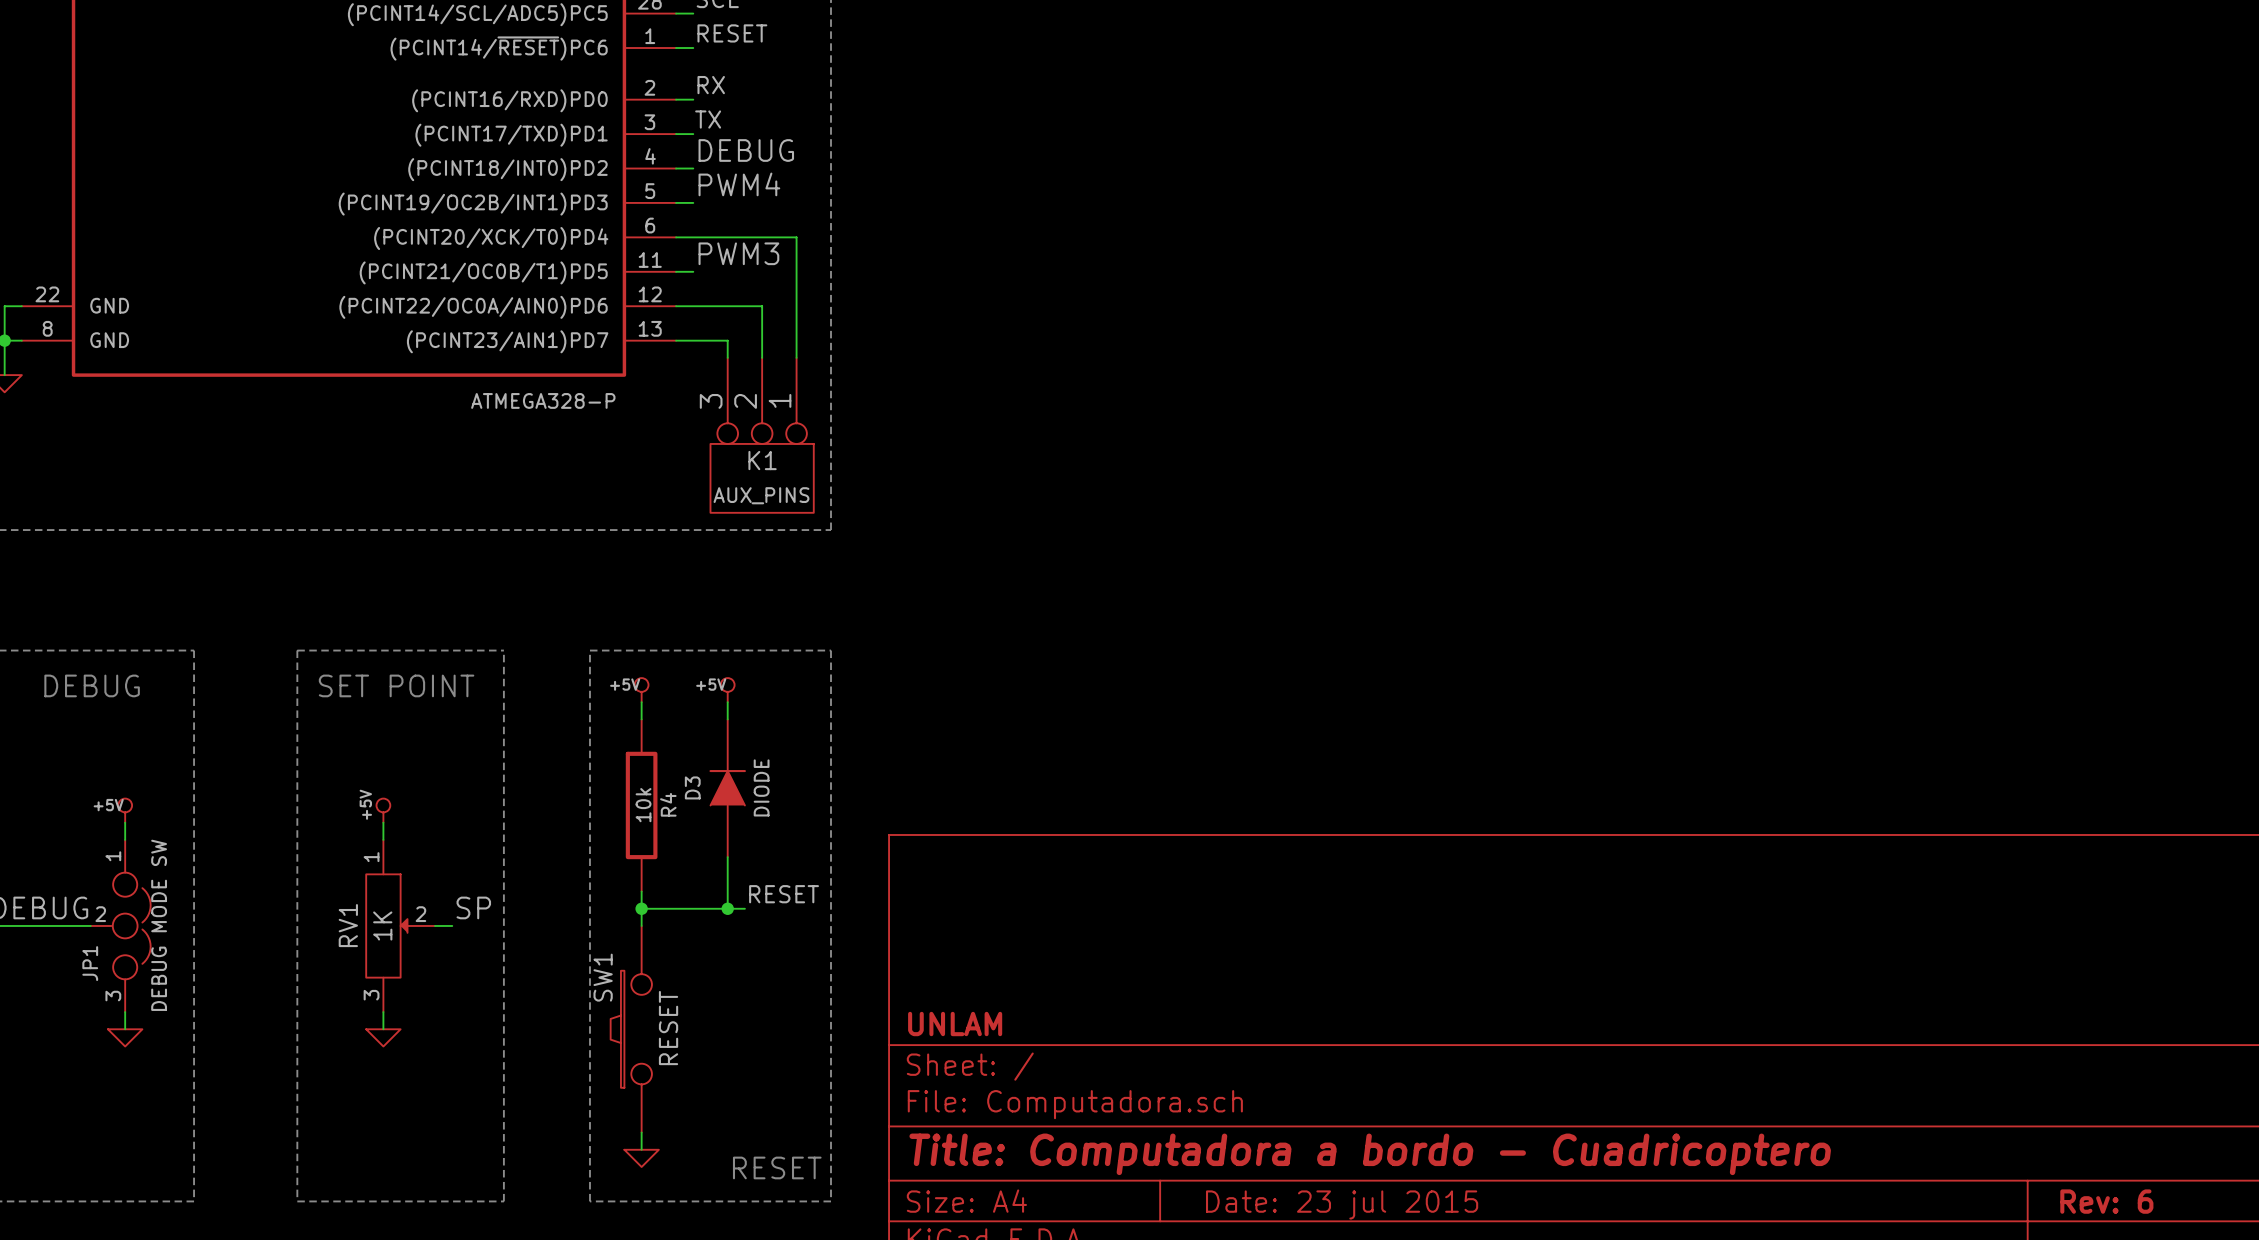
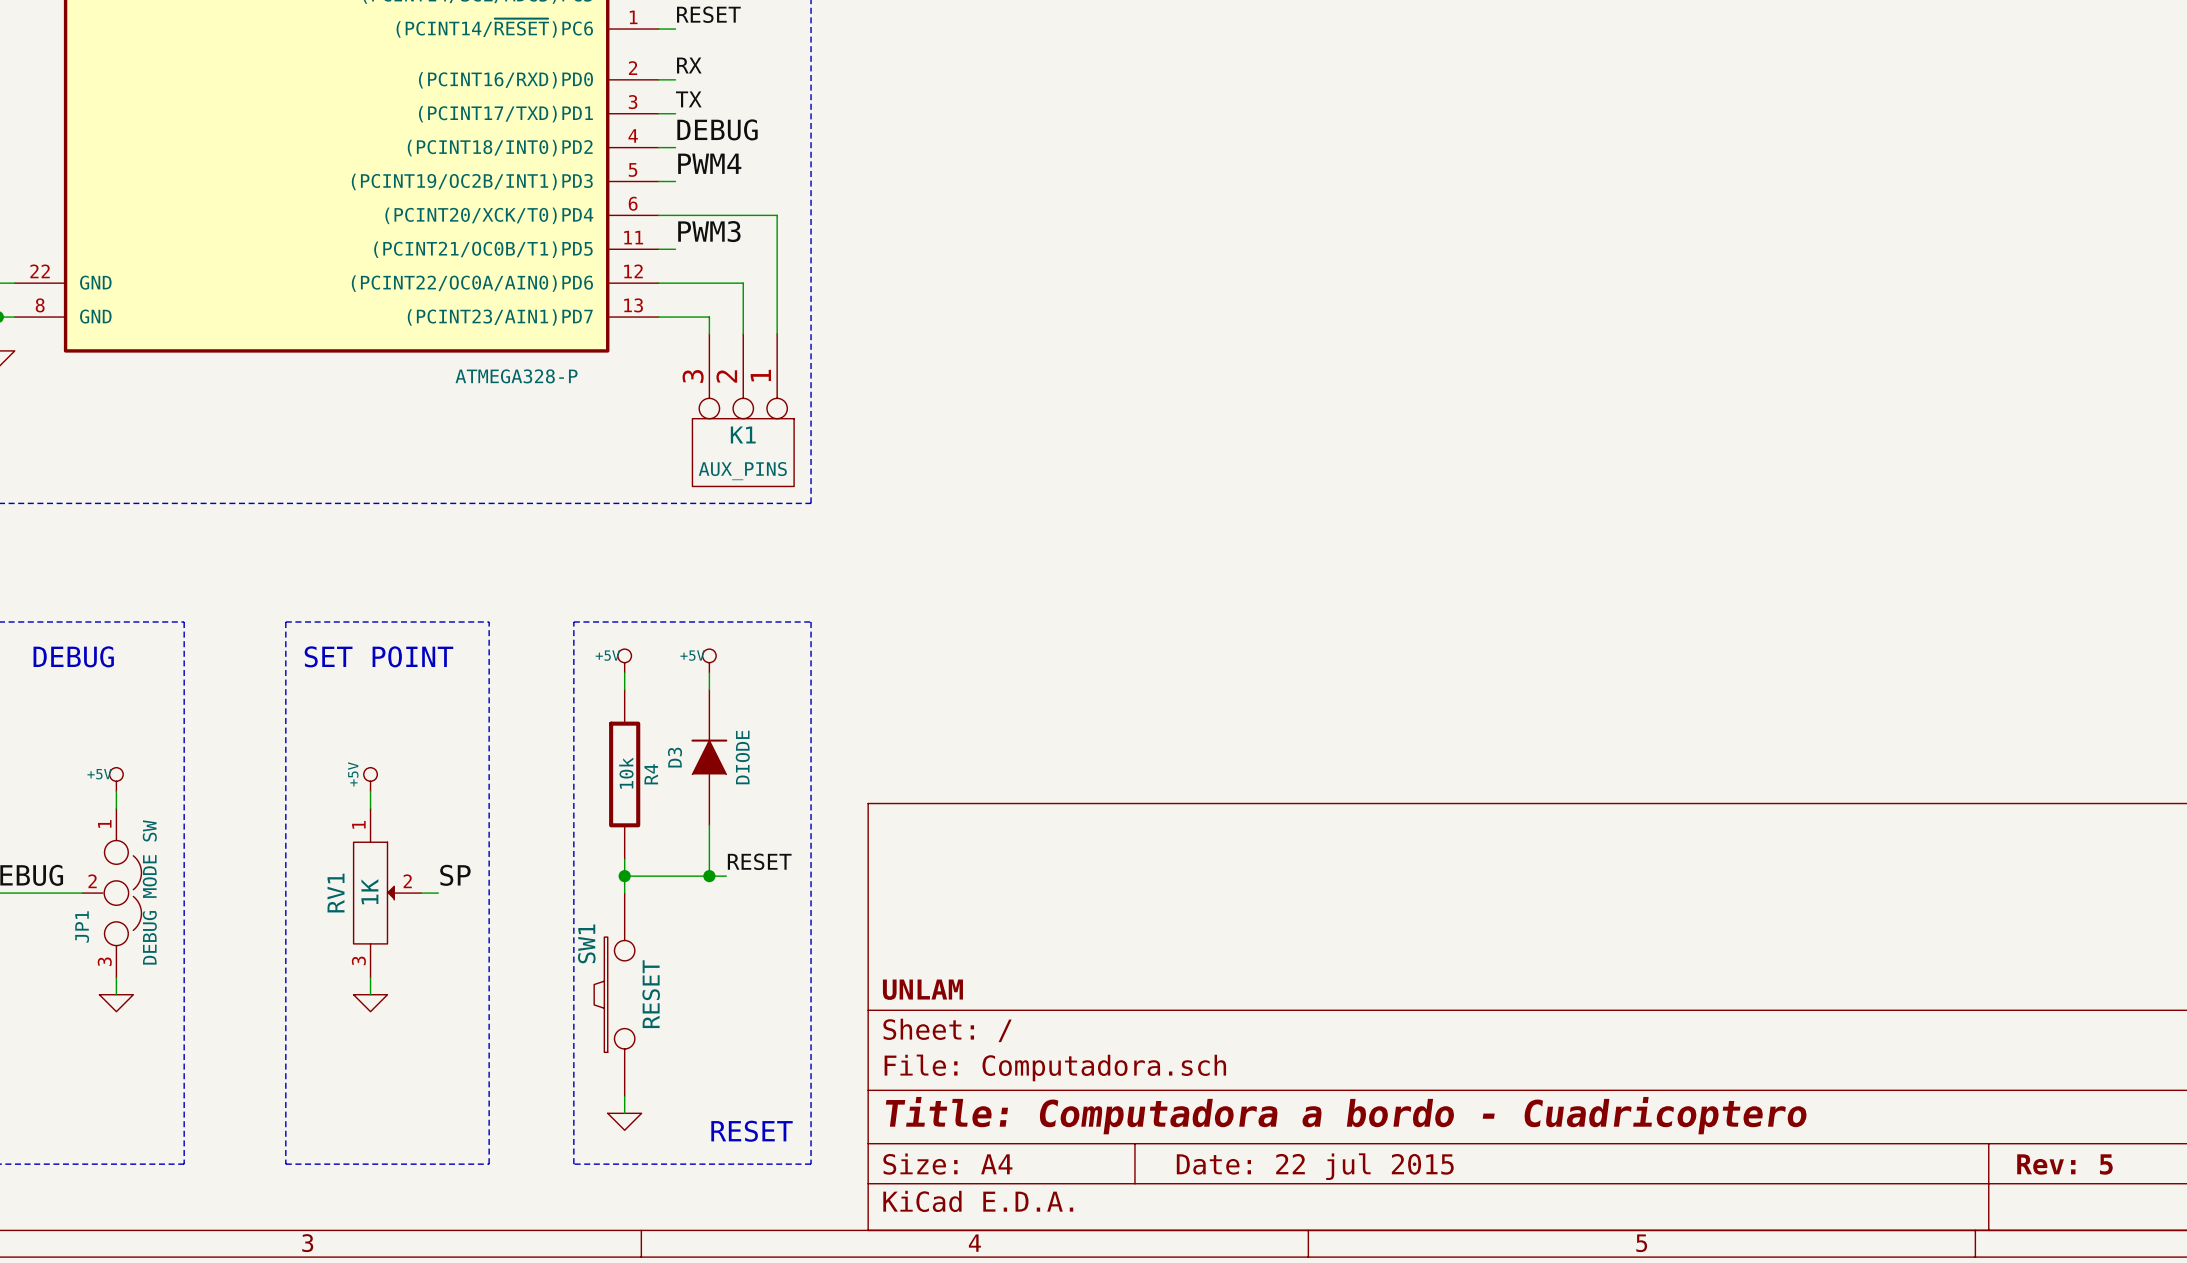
title block: Rev: 6 (2106, 1201) -> Rev: 5 (2064, 1164)
title block: Date: 23 jul 2015 (1342, 1204) -> Date: 22 jul 2015 (1315, 1166)

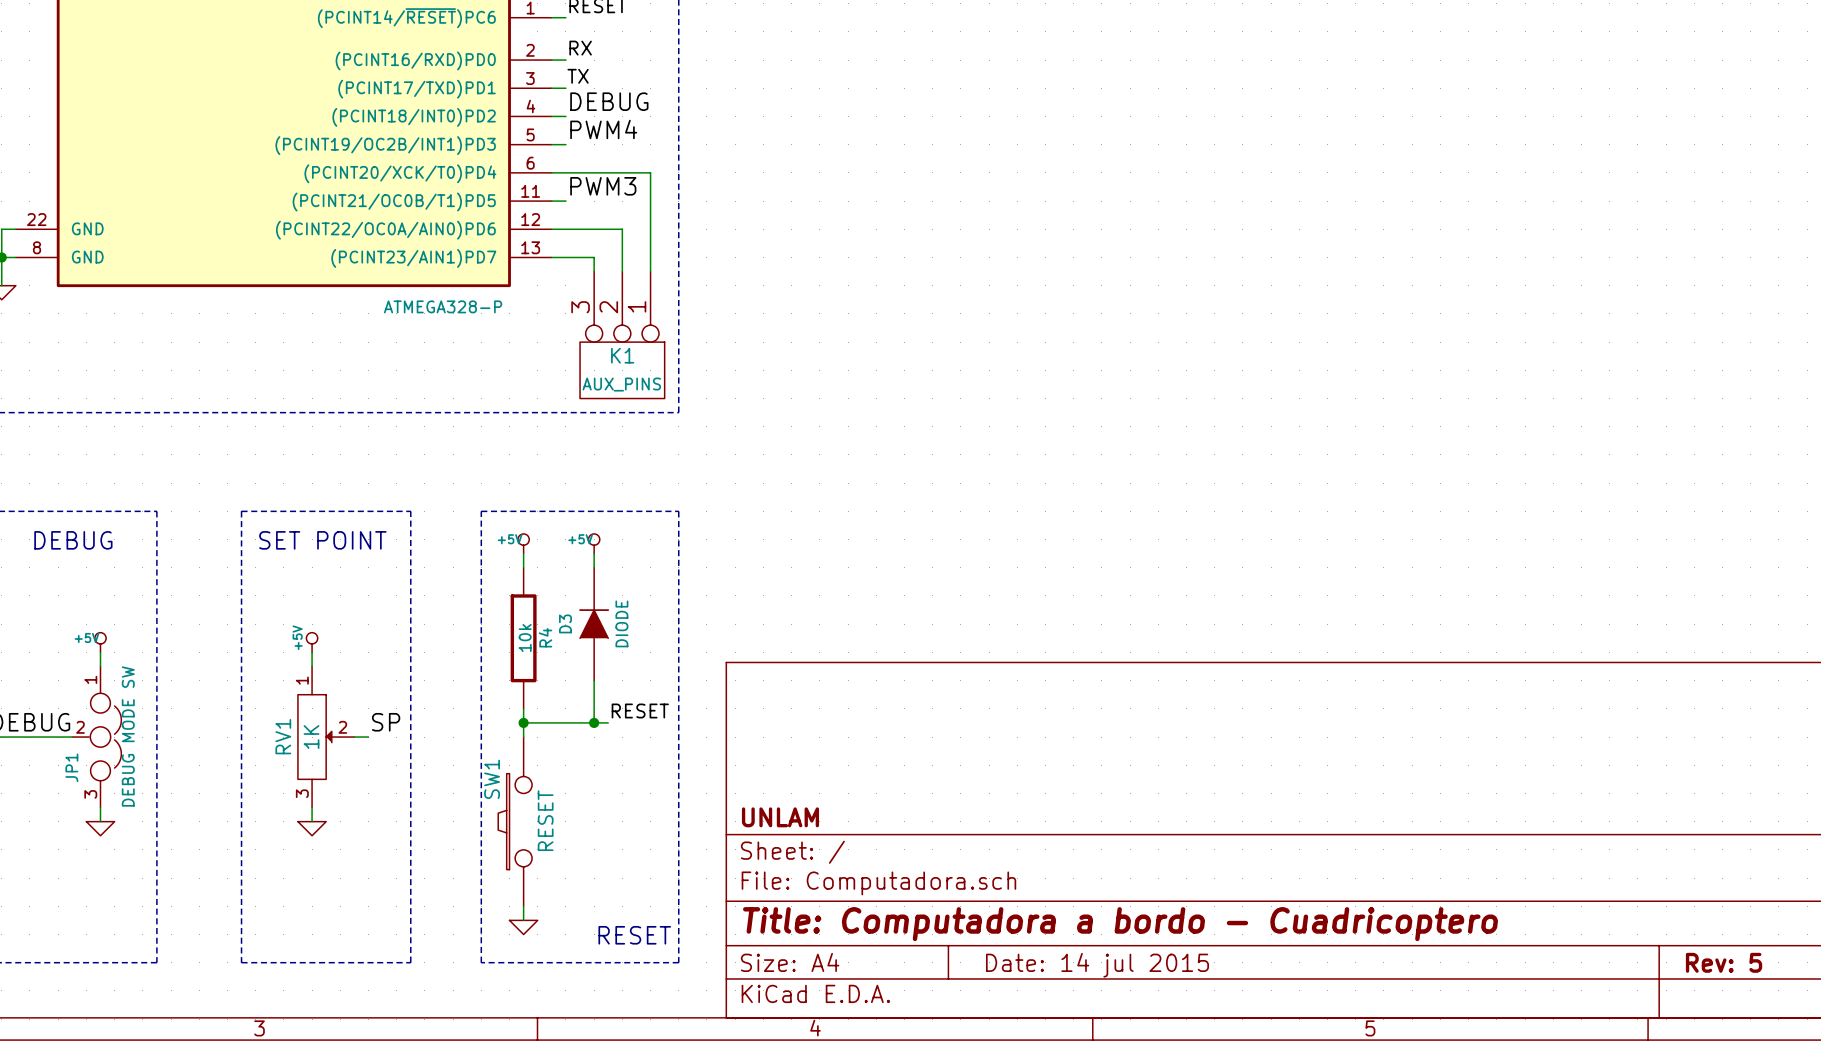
title block: Date: 22 jul 2015 (1315, 1166) -> Date: 14 jul 2015 (1097, 965)

